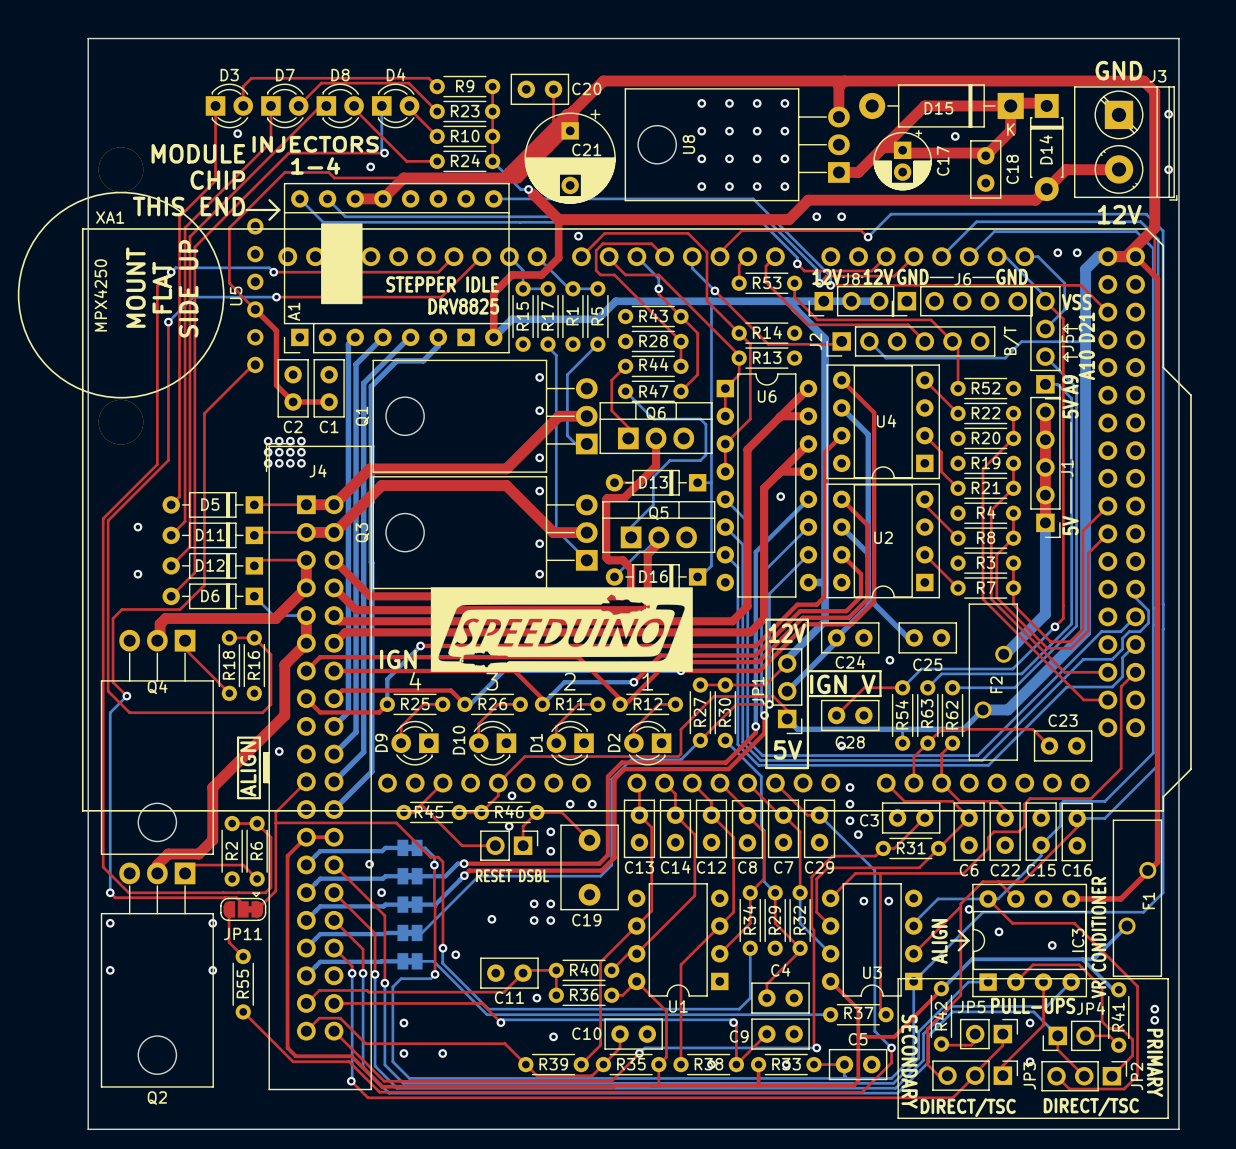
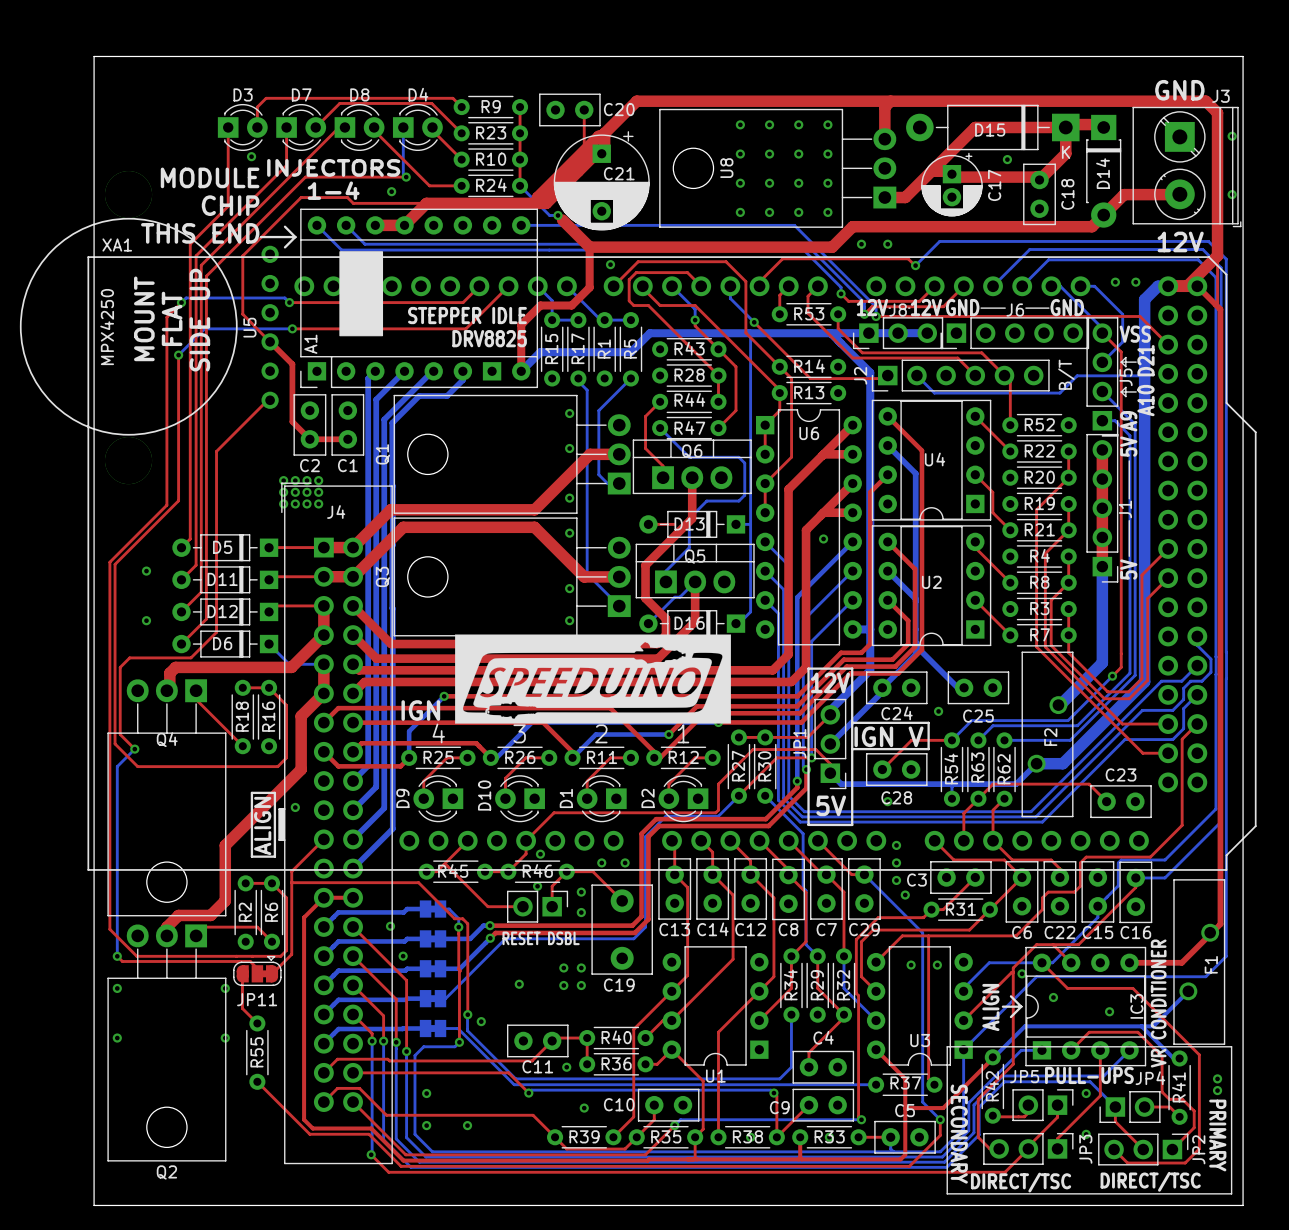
top track: (656, 466) (624, 497) (606, 499) (606, 557) (608, 560) (622, 560) (631, 568) (631, 572) -> (692, 506) (692, 518) (645, 565) (645, 598) (665, 618)
top track: (658, 543) (647, 554) (647, 610) (623, 610) -> (695, 588) (695, 621) (658, 658)

